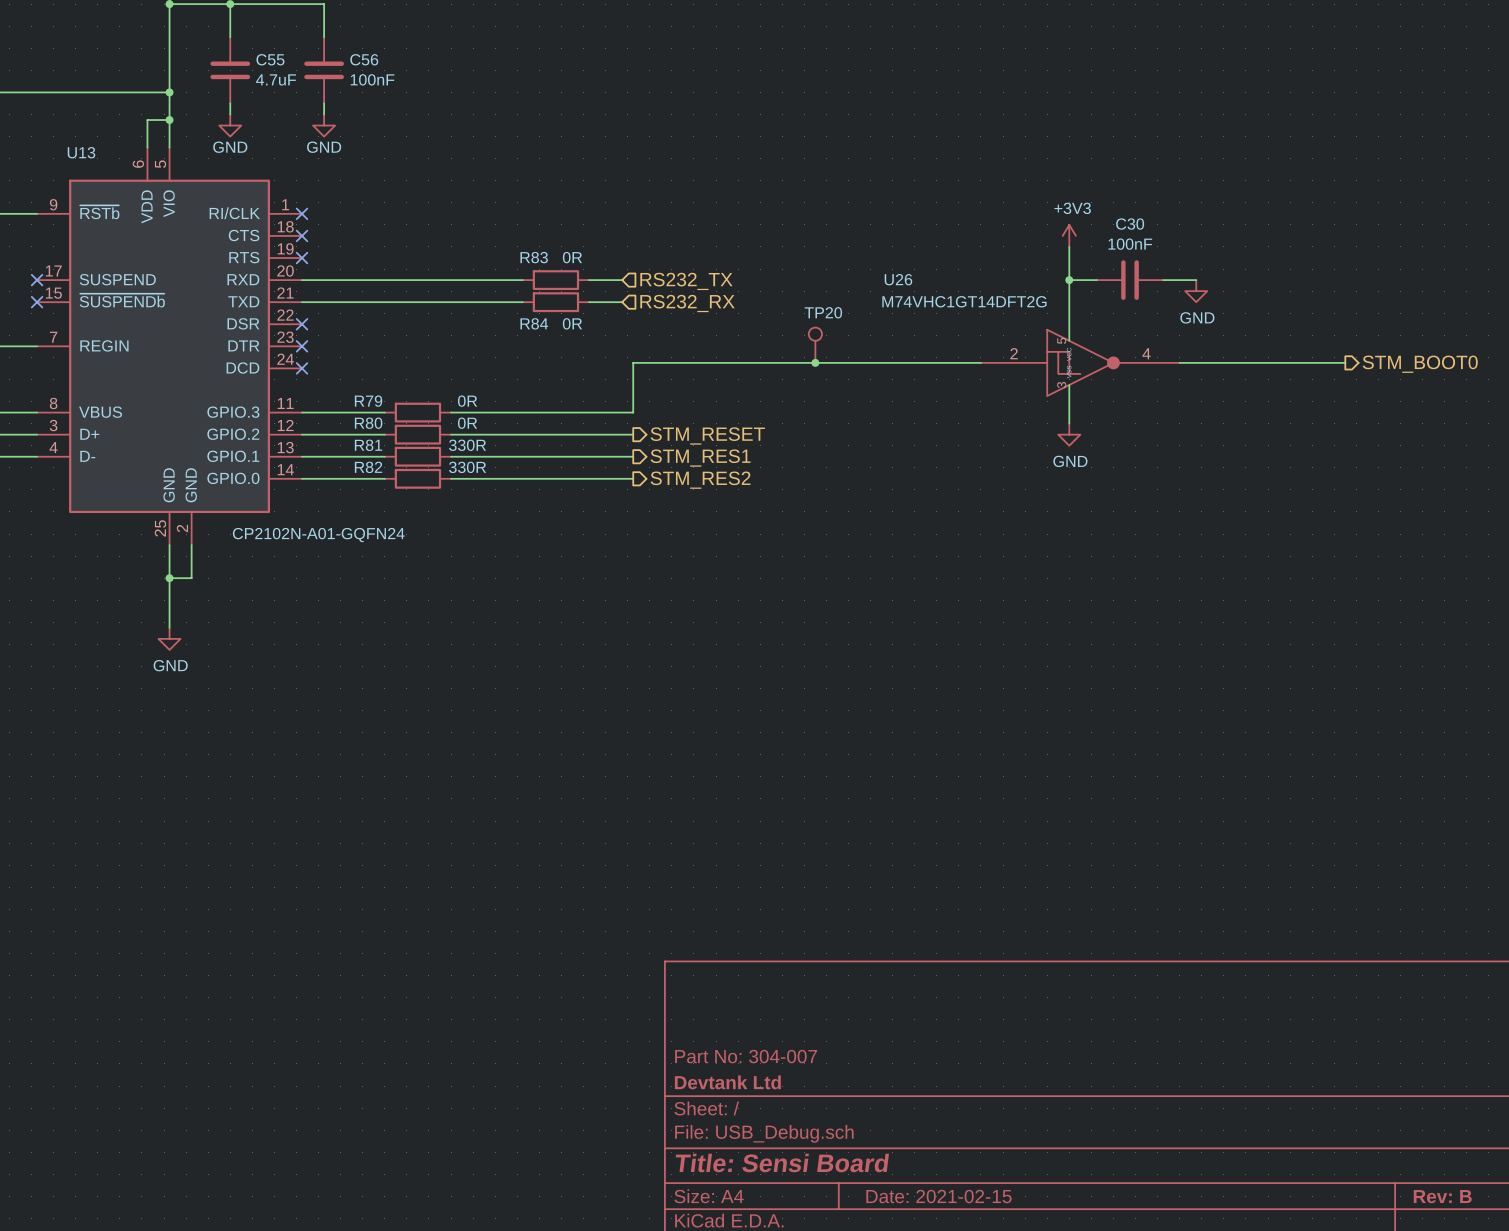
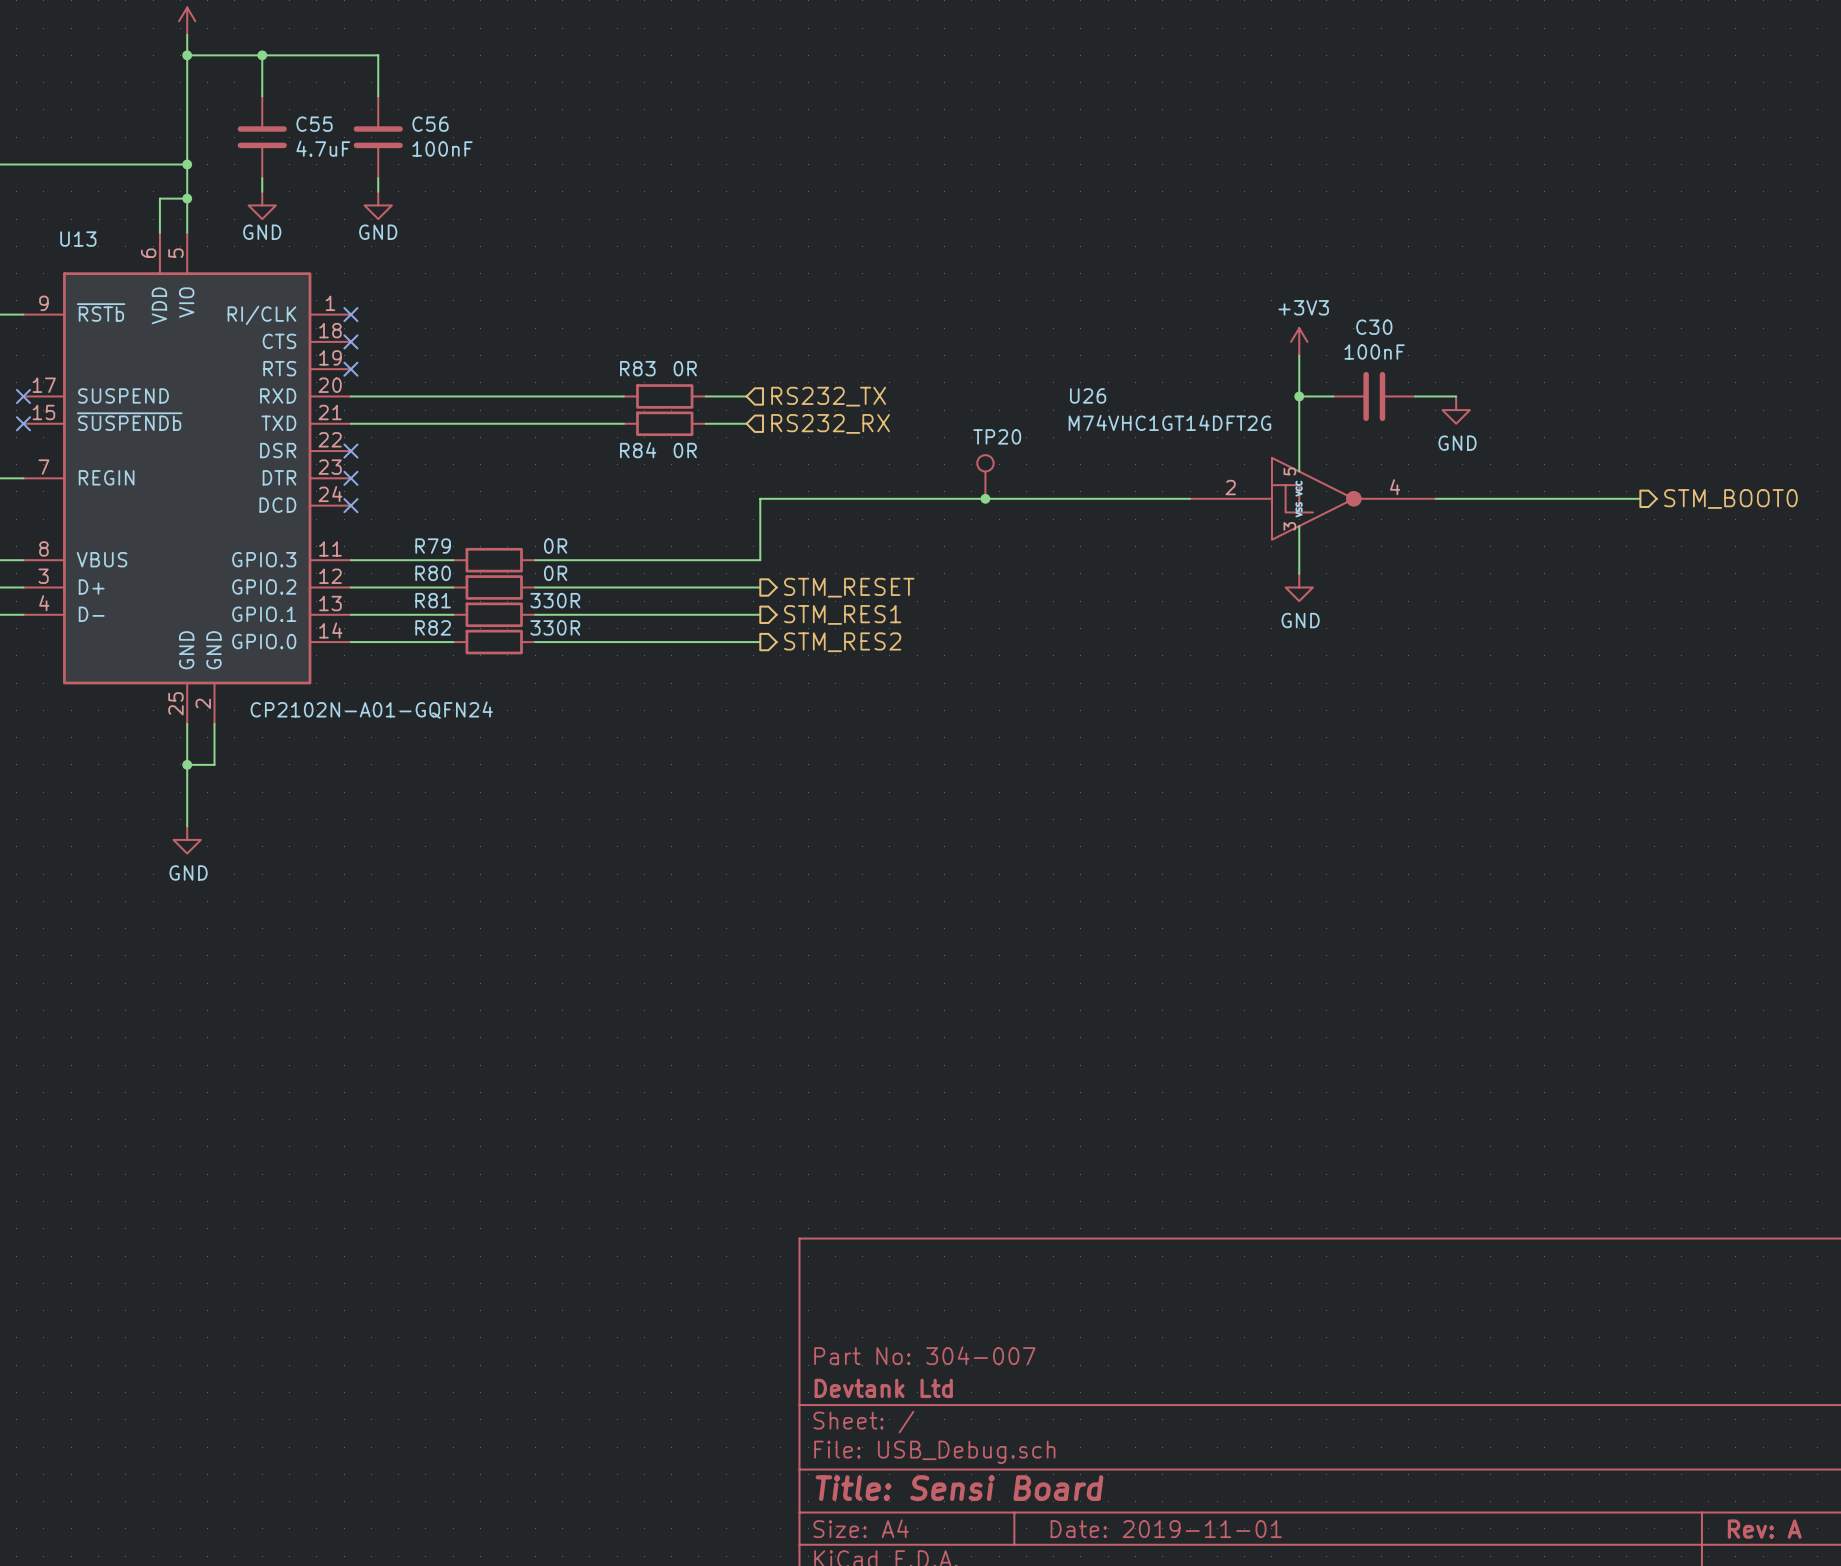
title block: Date: 2021-02-15 (939, 1196) -> Date: 2019-11-01 (1166, 1529)
title block: Rev: B (1442, 1196) -> Rev: A (1764, 1529)

